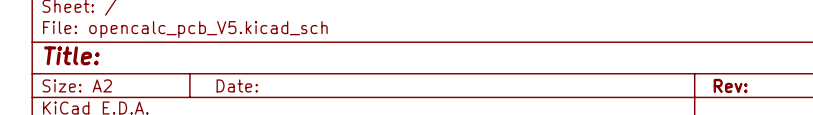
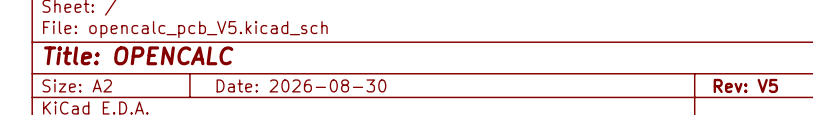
title block: Title: (71, 55) -> Title: OPENCALC (138, 55)
title block: Date: (237, 85) -> Date: 2026-08-30 (301, 85)
title block: Rev: (730, 85) -> Rev: V5 (745, 85)

